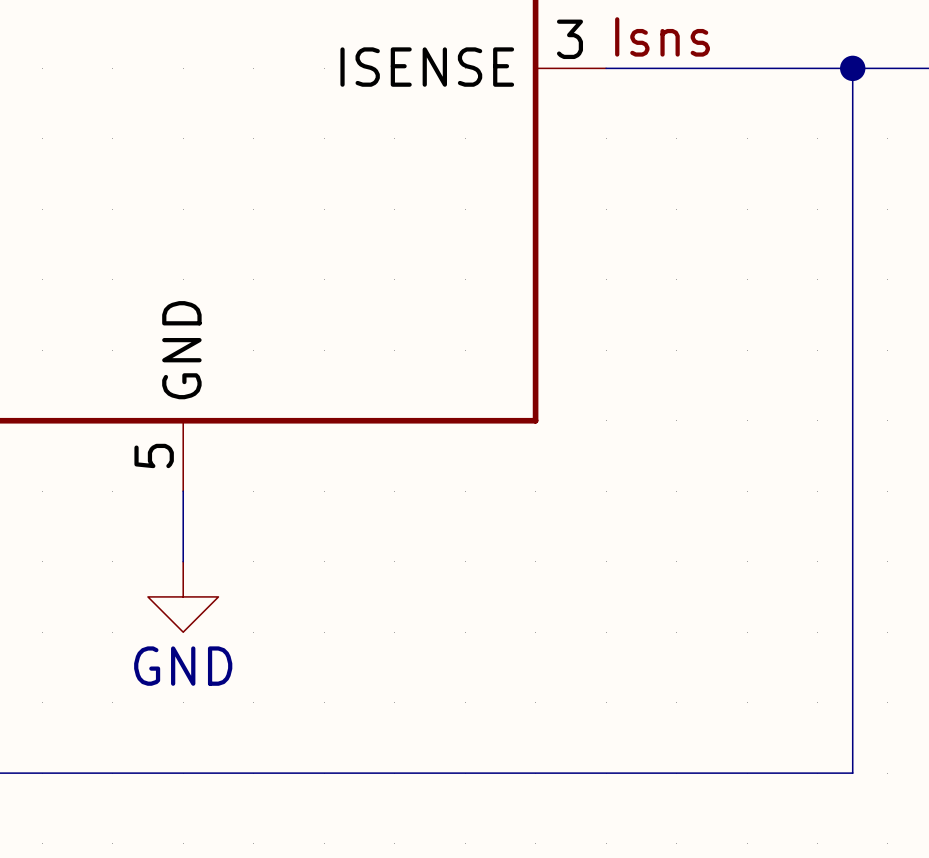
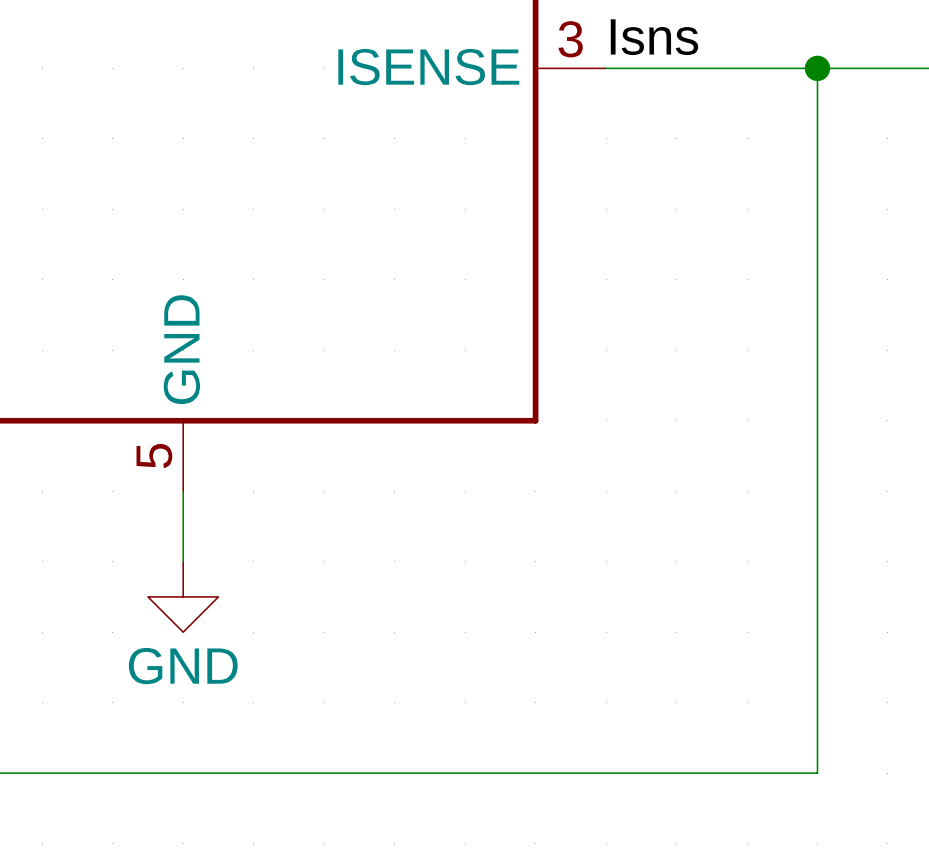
wire: (852, 68) (852, 773) (817, 773) -> (817, 68) (817, 773)
junction position: (852, 68) -> (817, 68)

